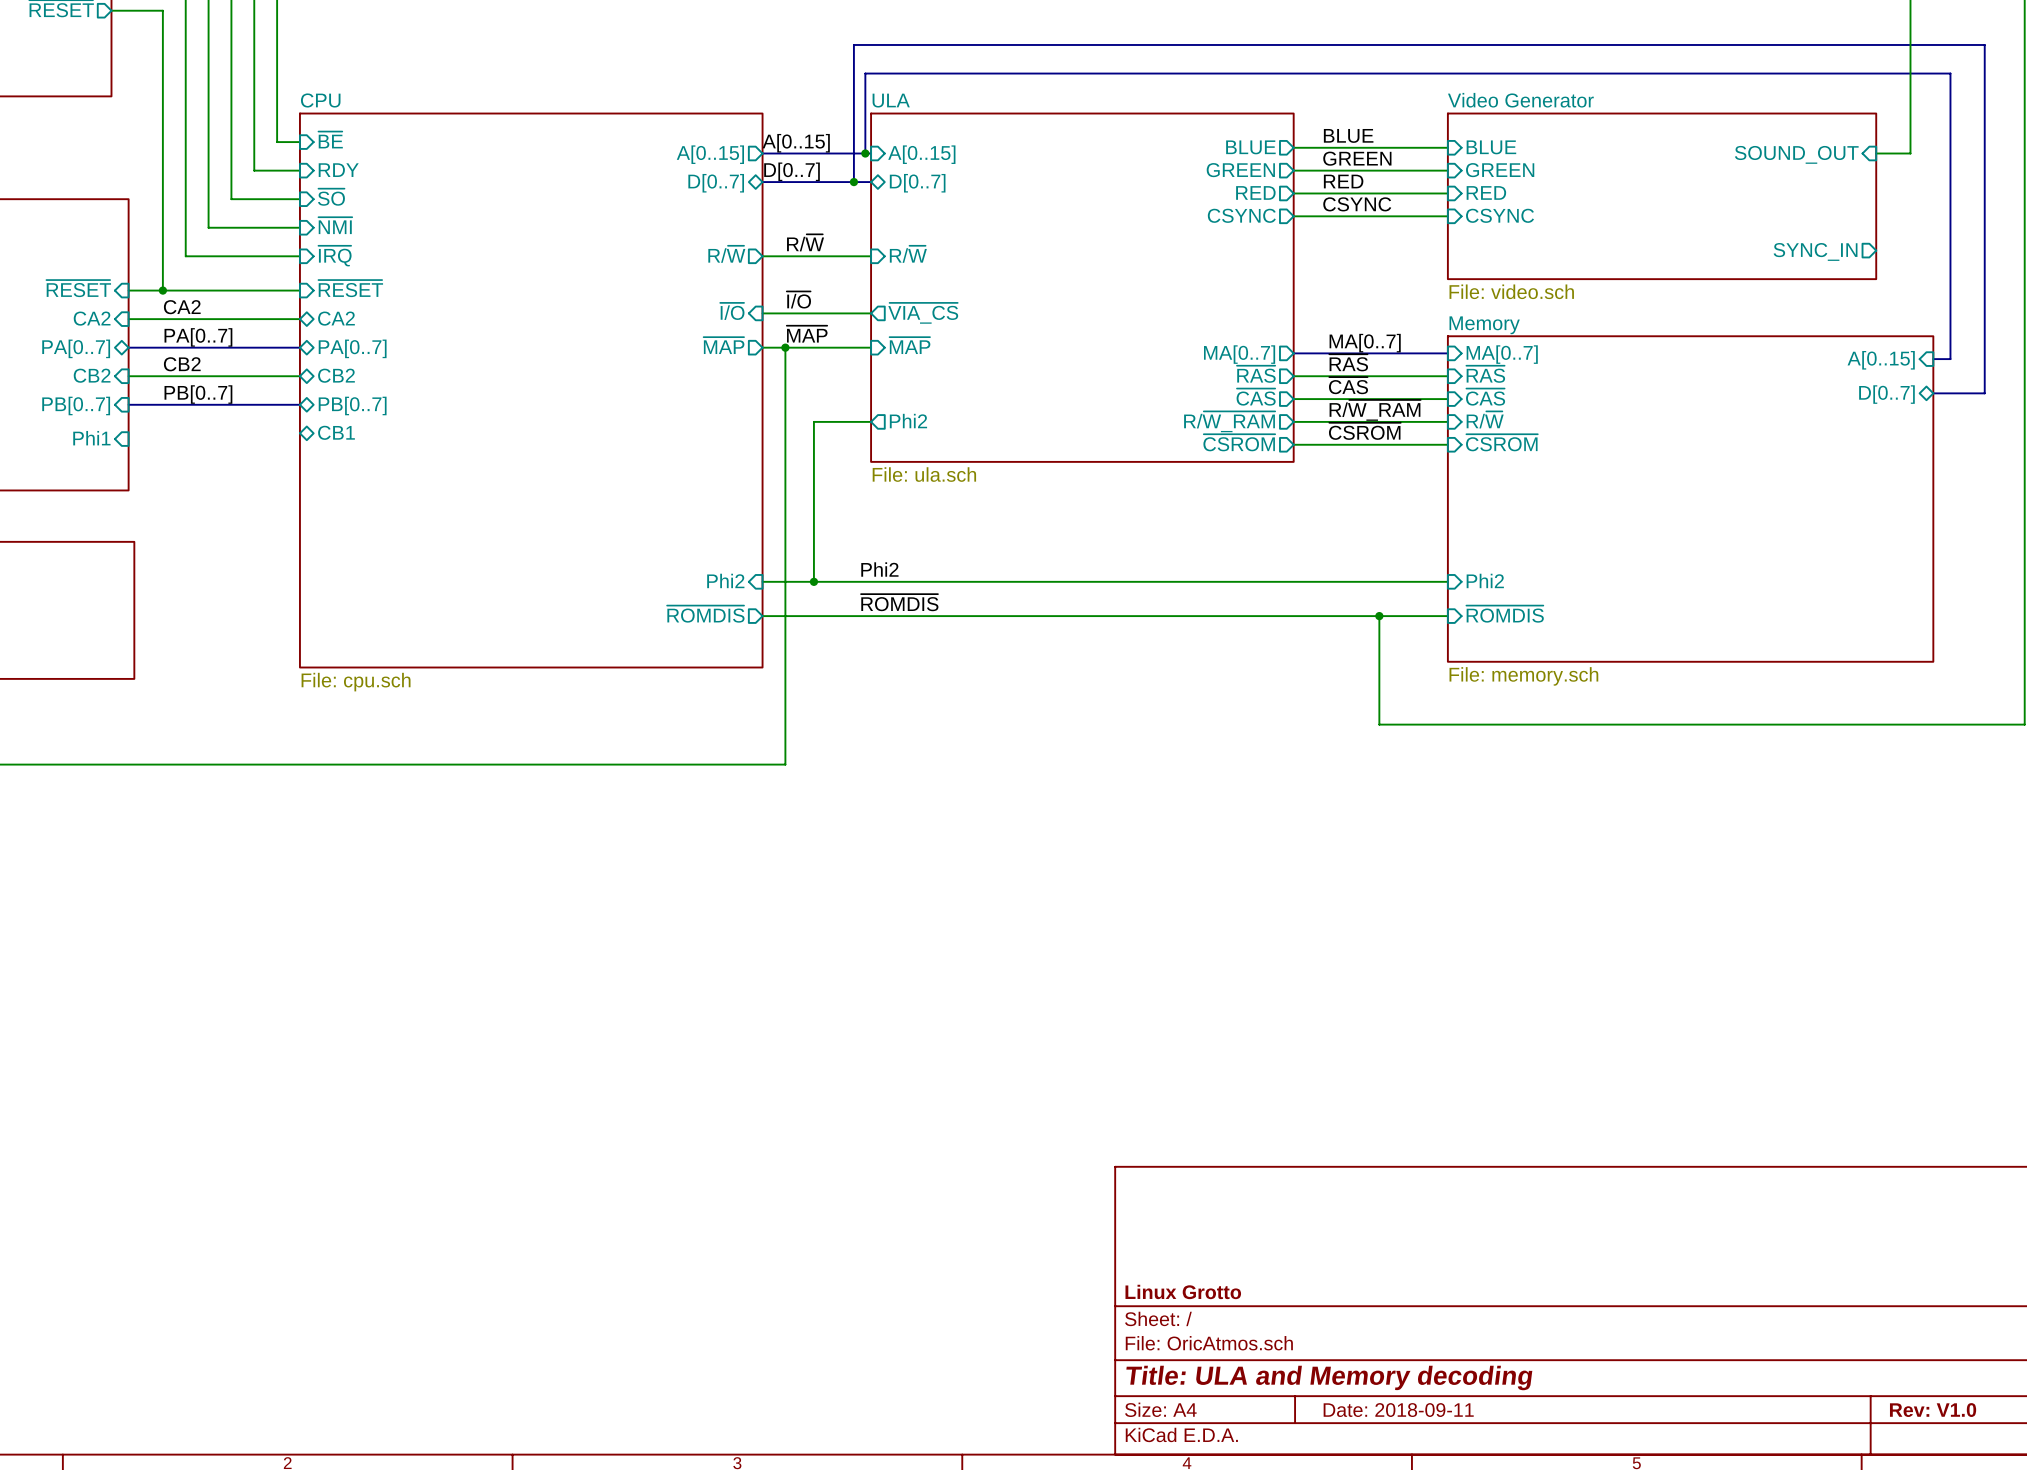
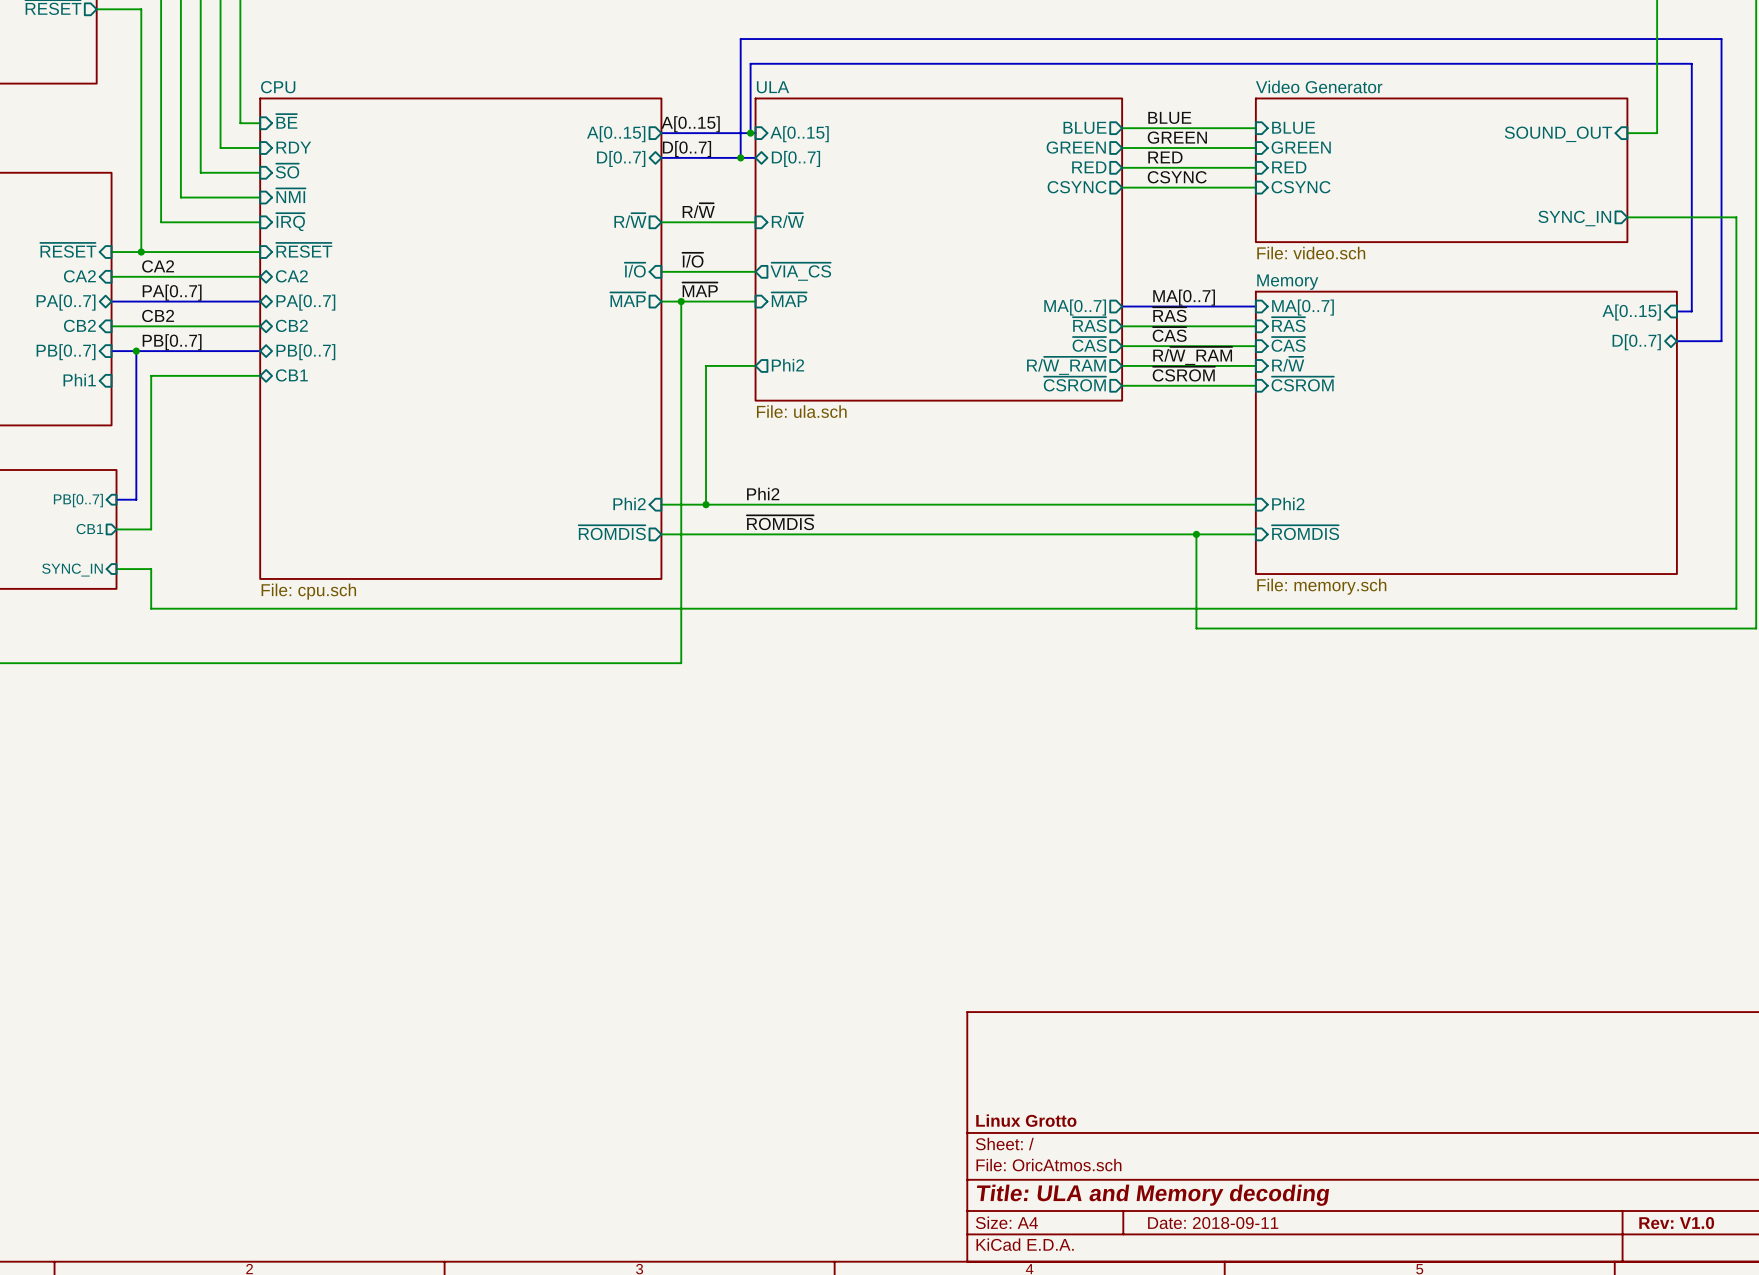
wire: none -> (1627, 217) (1736, 217) (1736, 608) (151, 608) (151, 569) (116, 569)
bus: none -> (136, 351) (136, 499) (116, 499)
junction: none -> (136, 351)
wire: none -> (260, 375) (151, 375) (151, 529) (116, 529)
sheet pin: none -> PB[0..7] (78, 500)
sheet pin: none -> CB1 (89, 529)
sheet pin: none -> SYNC_IN (72, 570)

